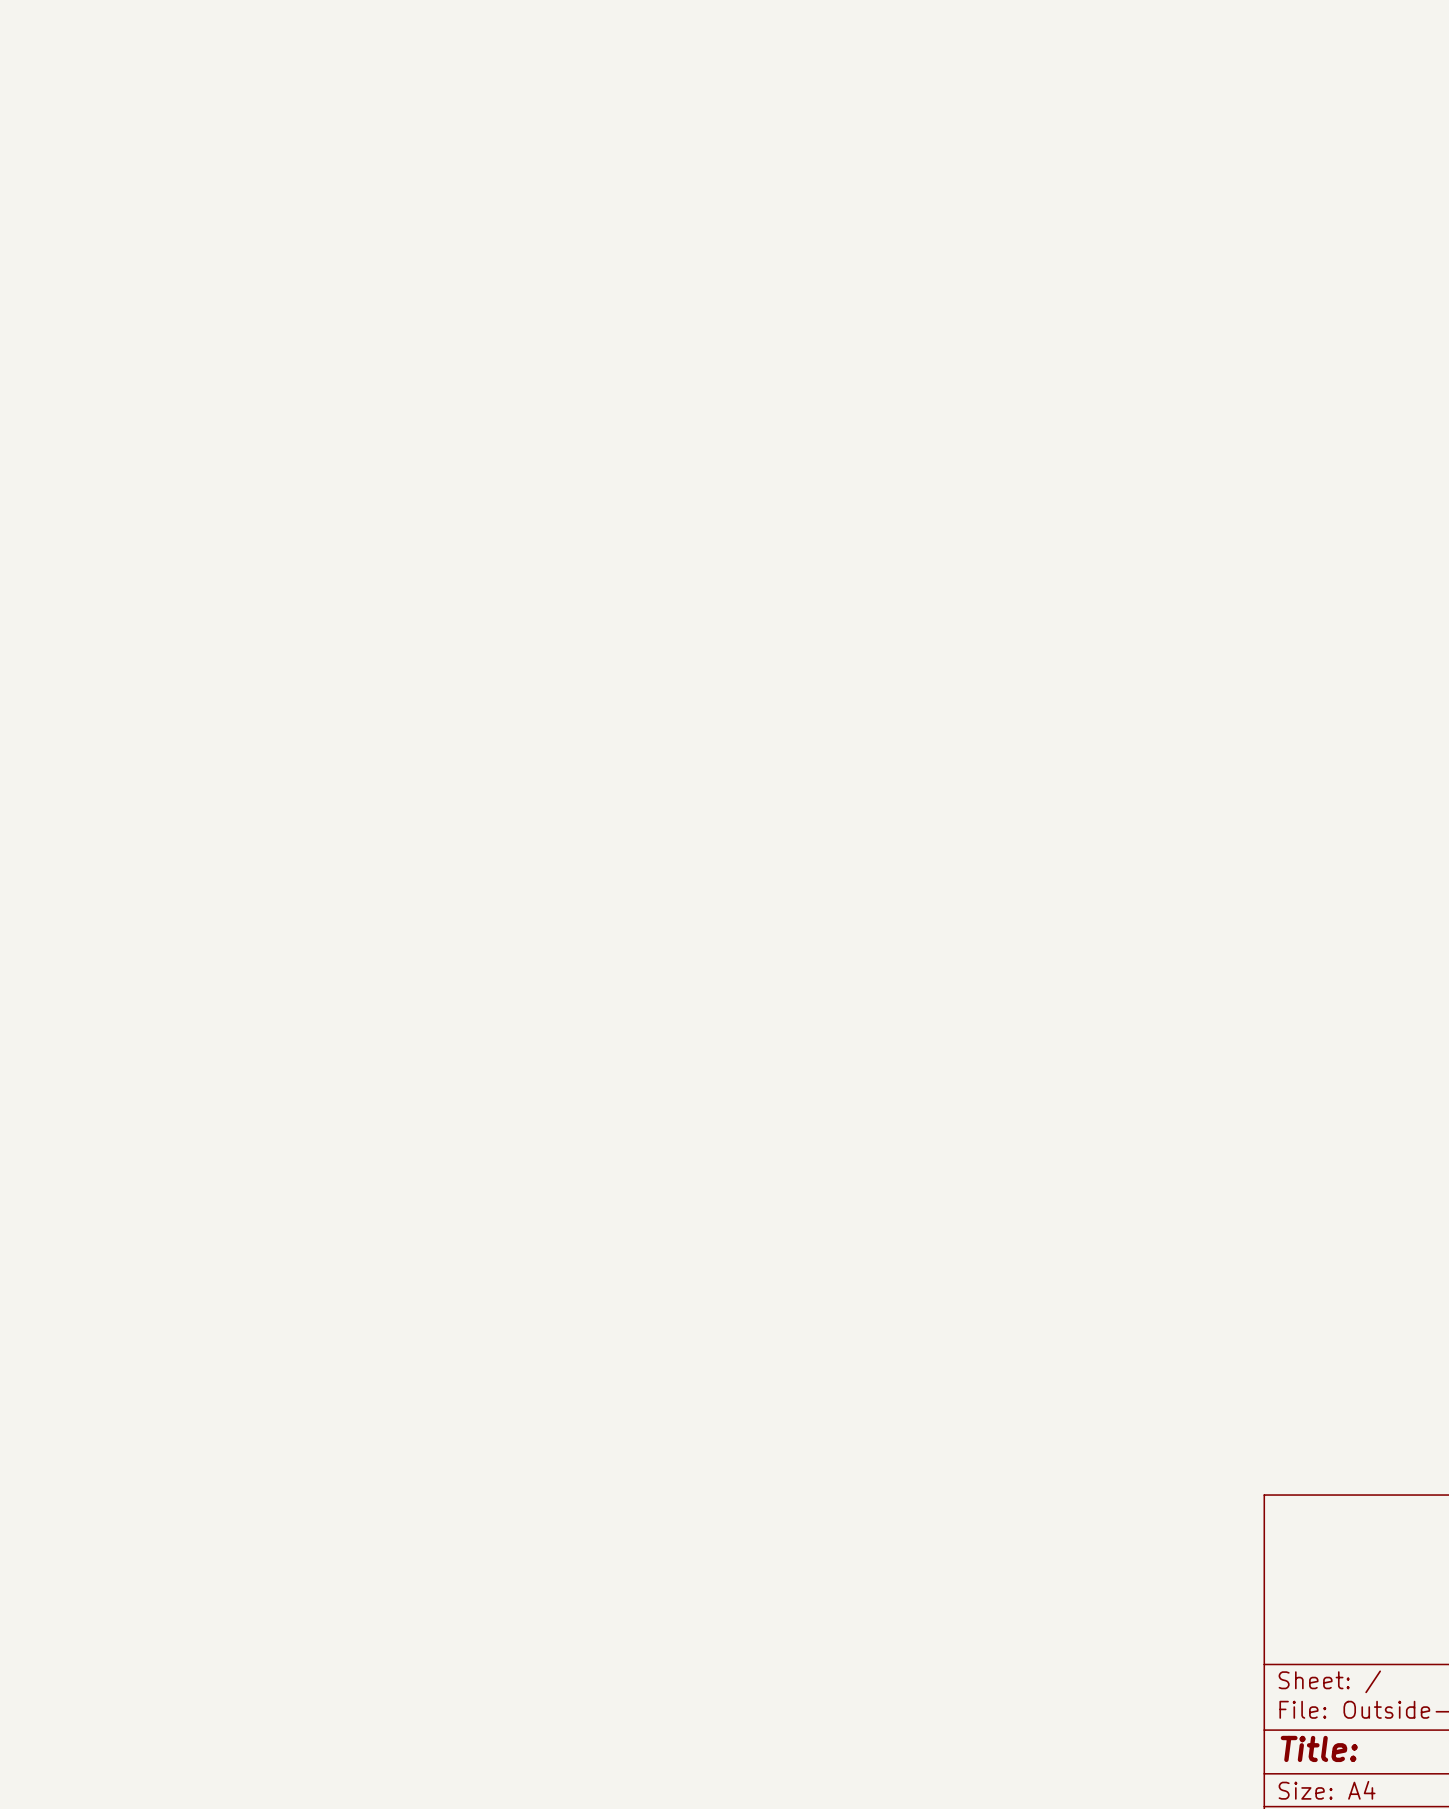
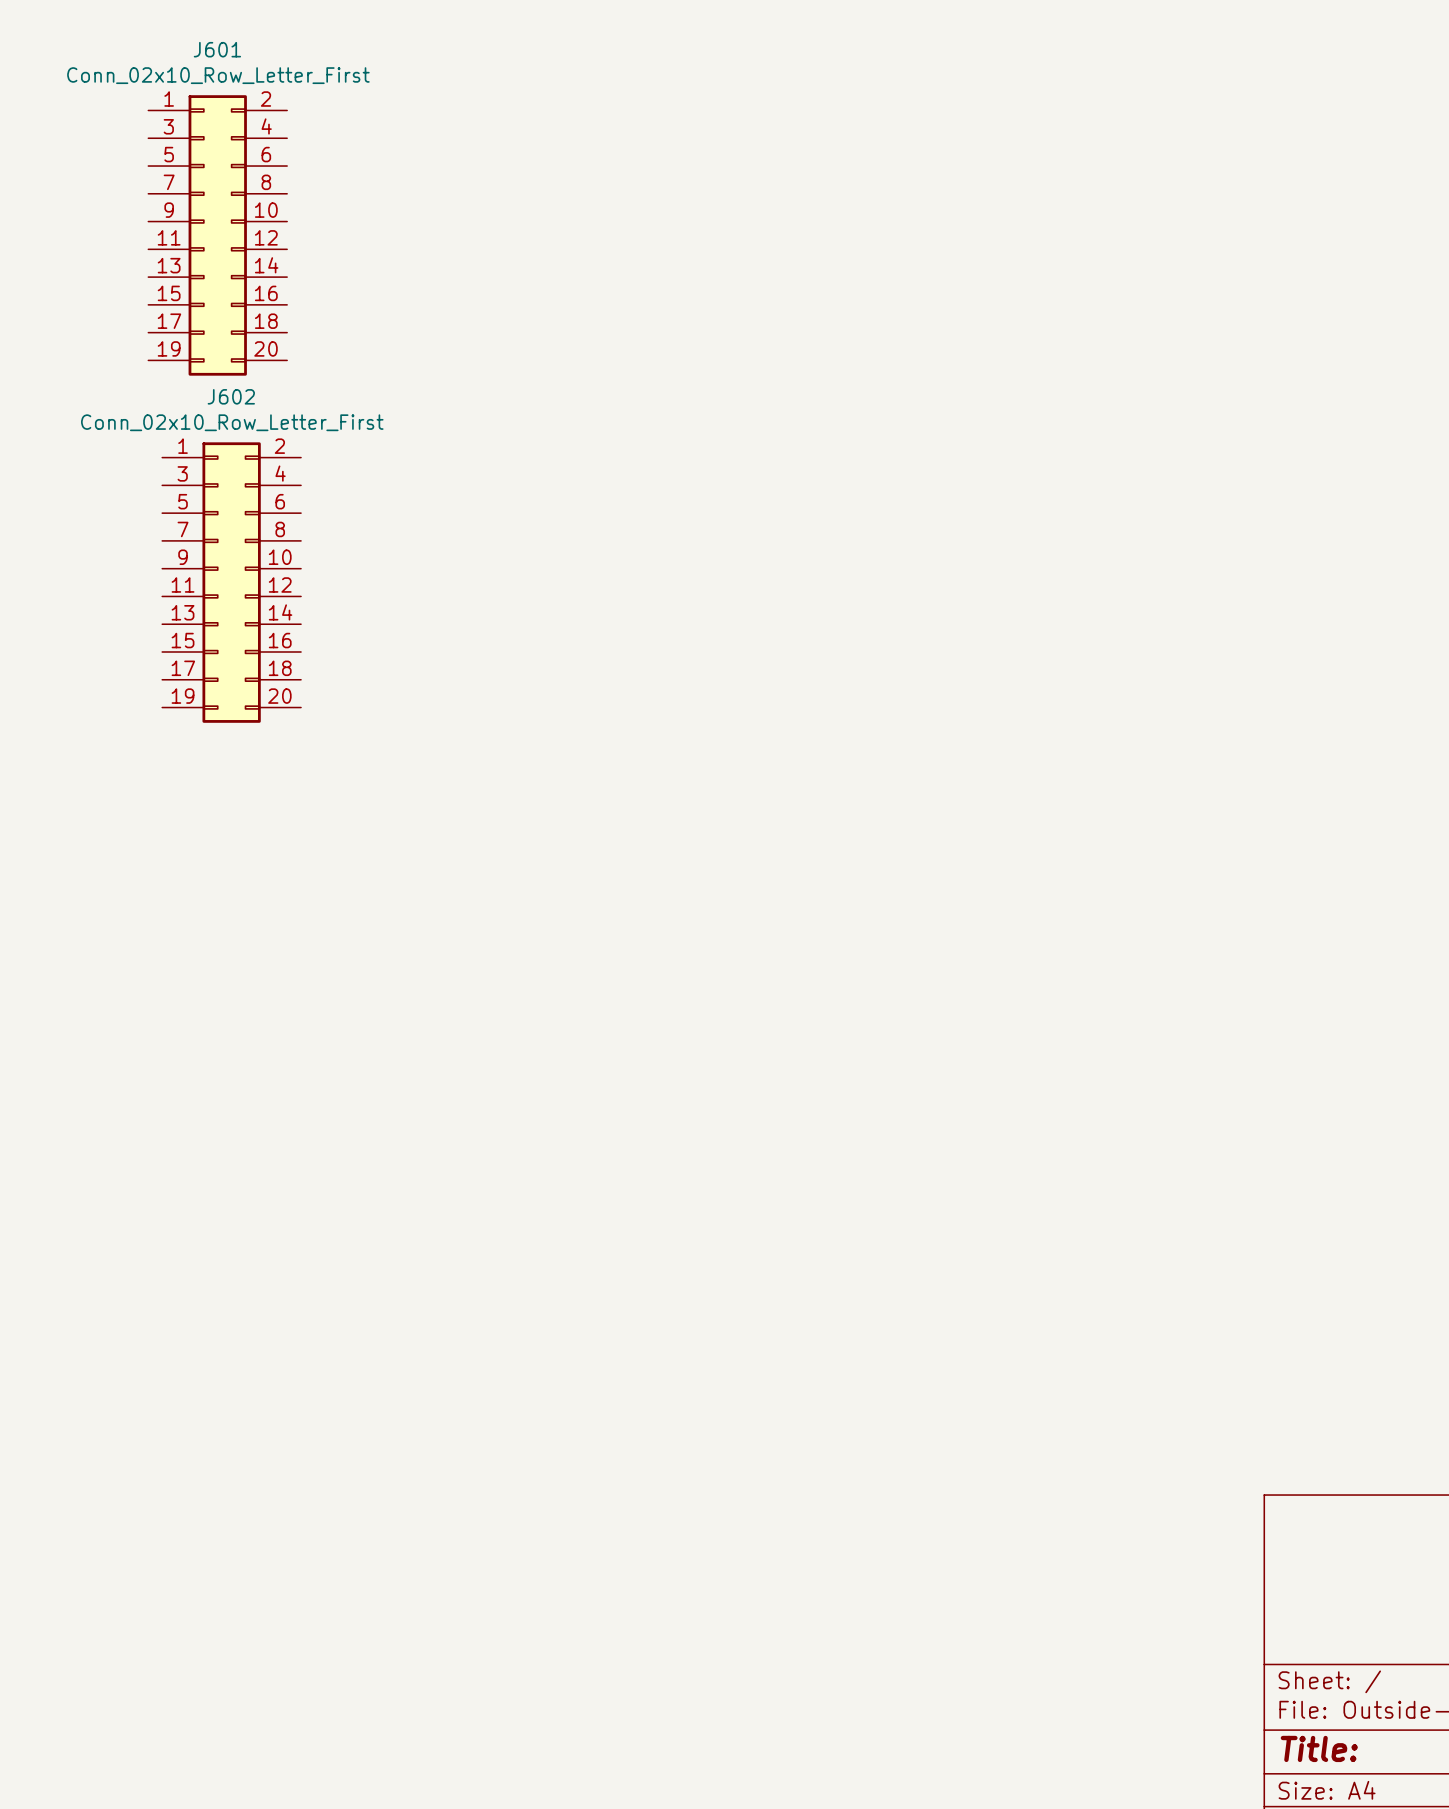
J601: none -> Conn_02x10_Row_Letter_First (217, 235)
J602: none -> Conn_02x10_Row_Letter_First (231, 582)

